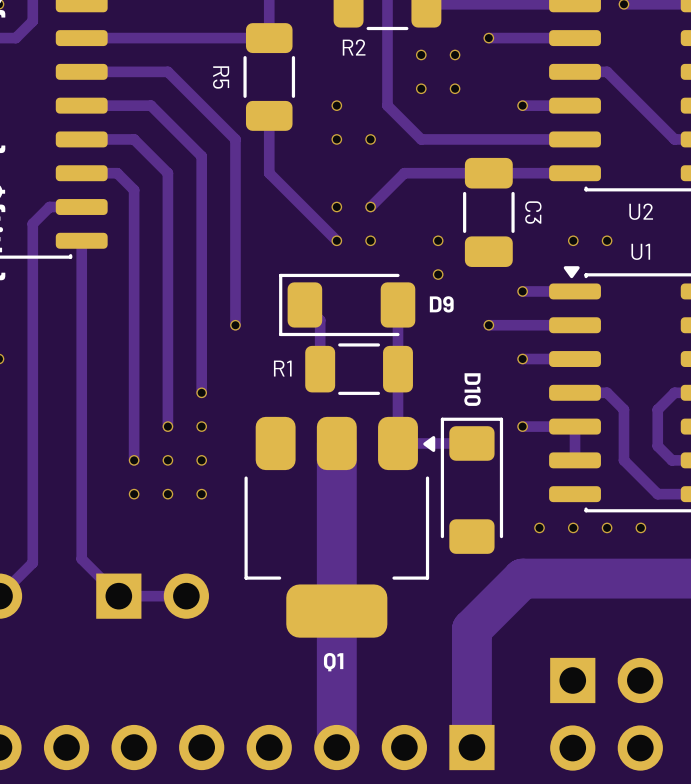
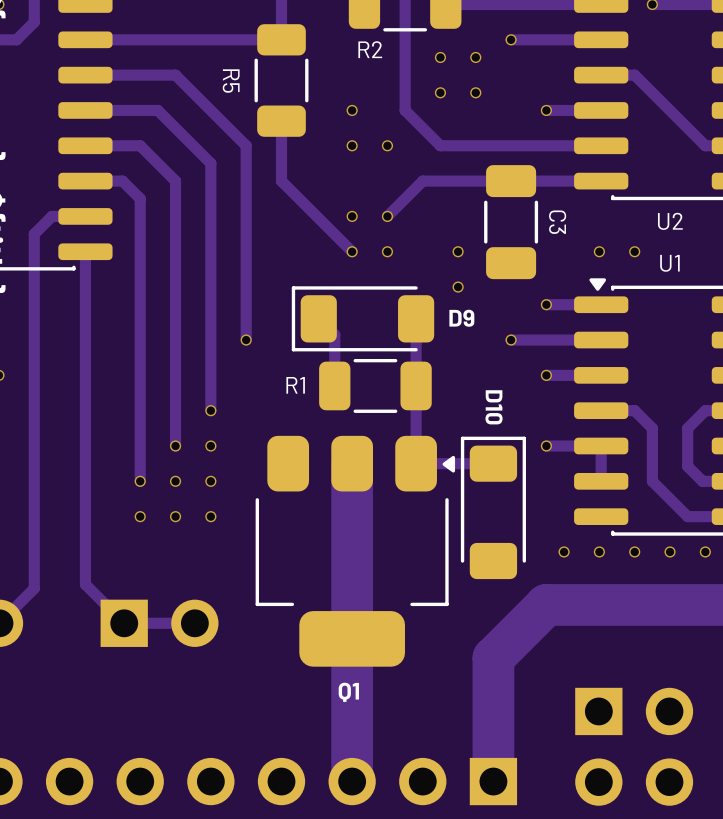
via: none -> (705, 551)

